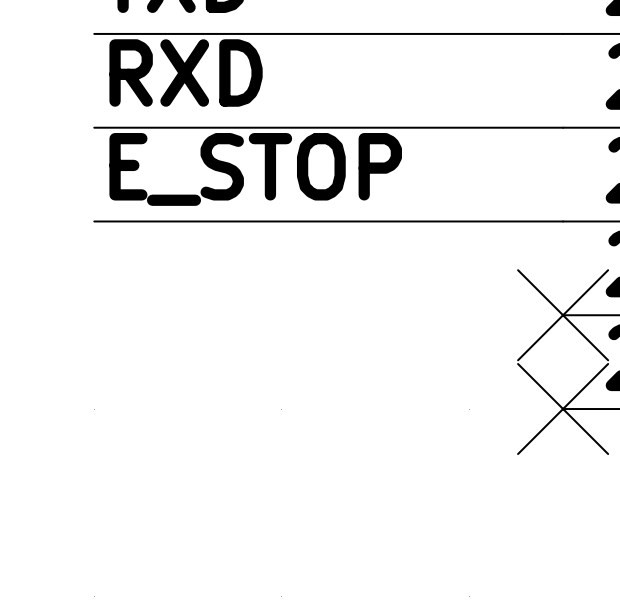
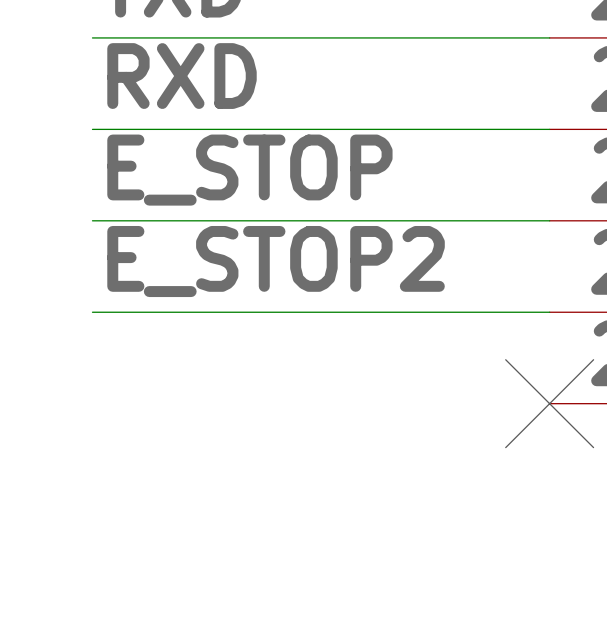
label: none -> E_STOP2 (276, 261)
wire: none -> (92, 312) (549, 312)
no-connect mark: (563, 315) -> none

